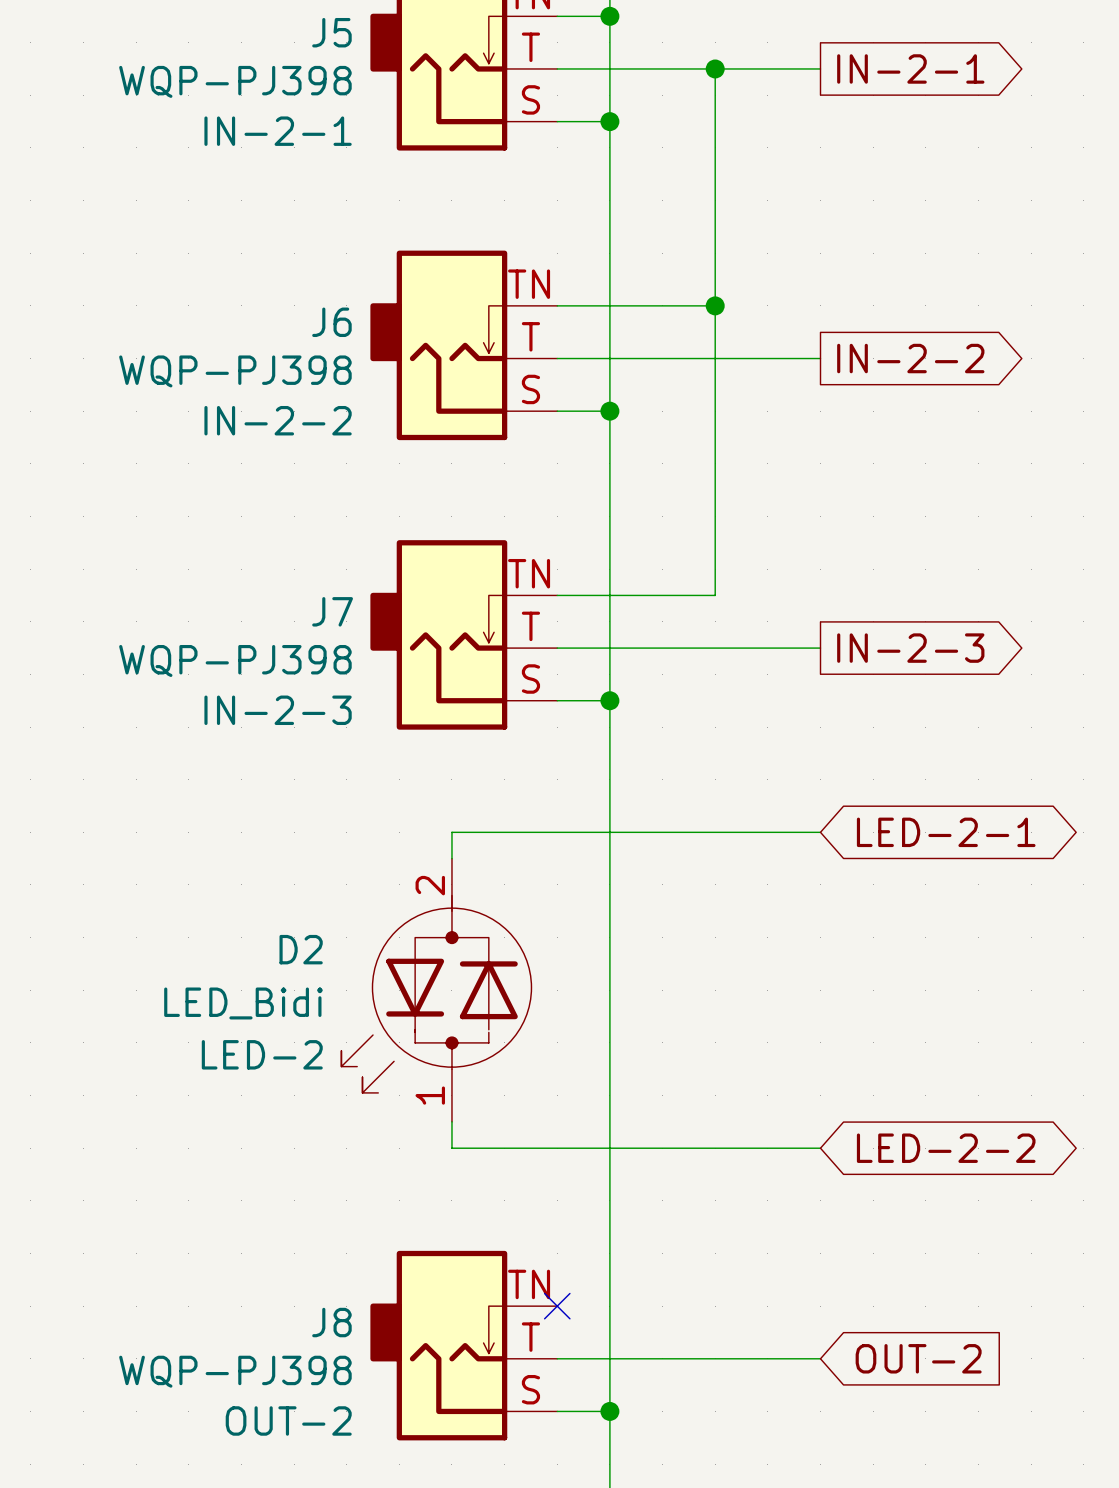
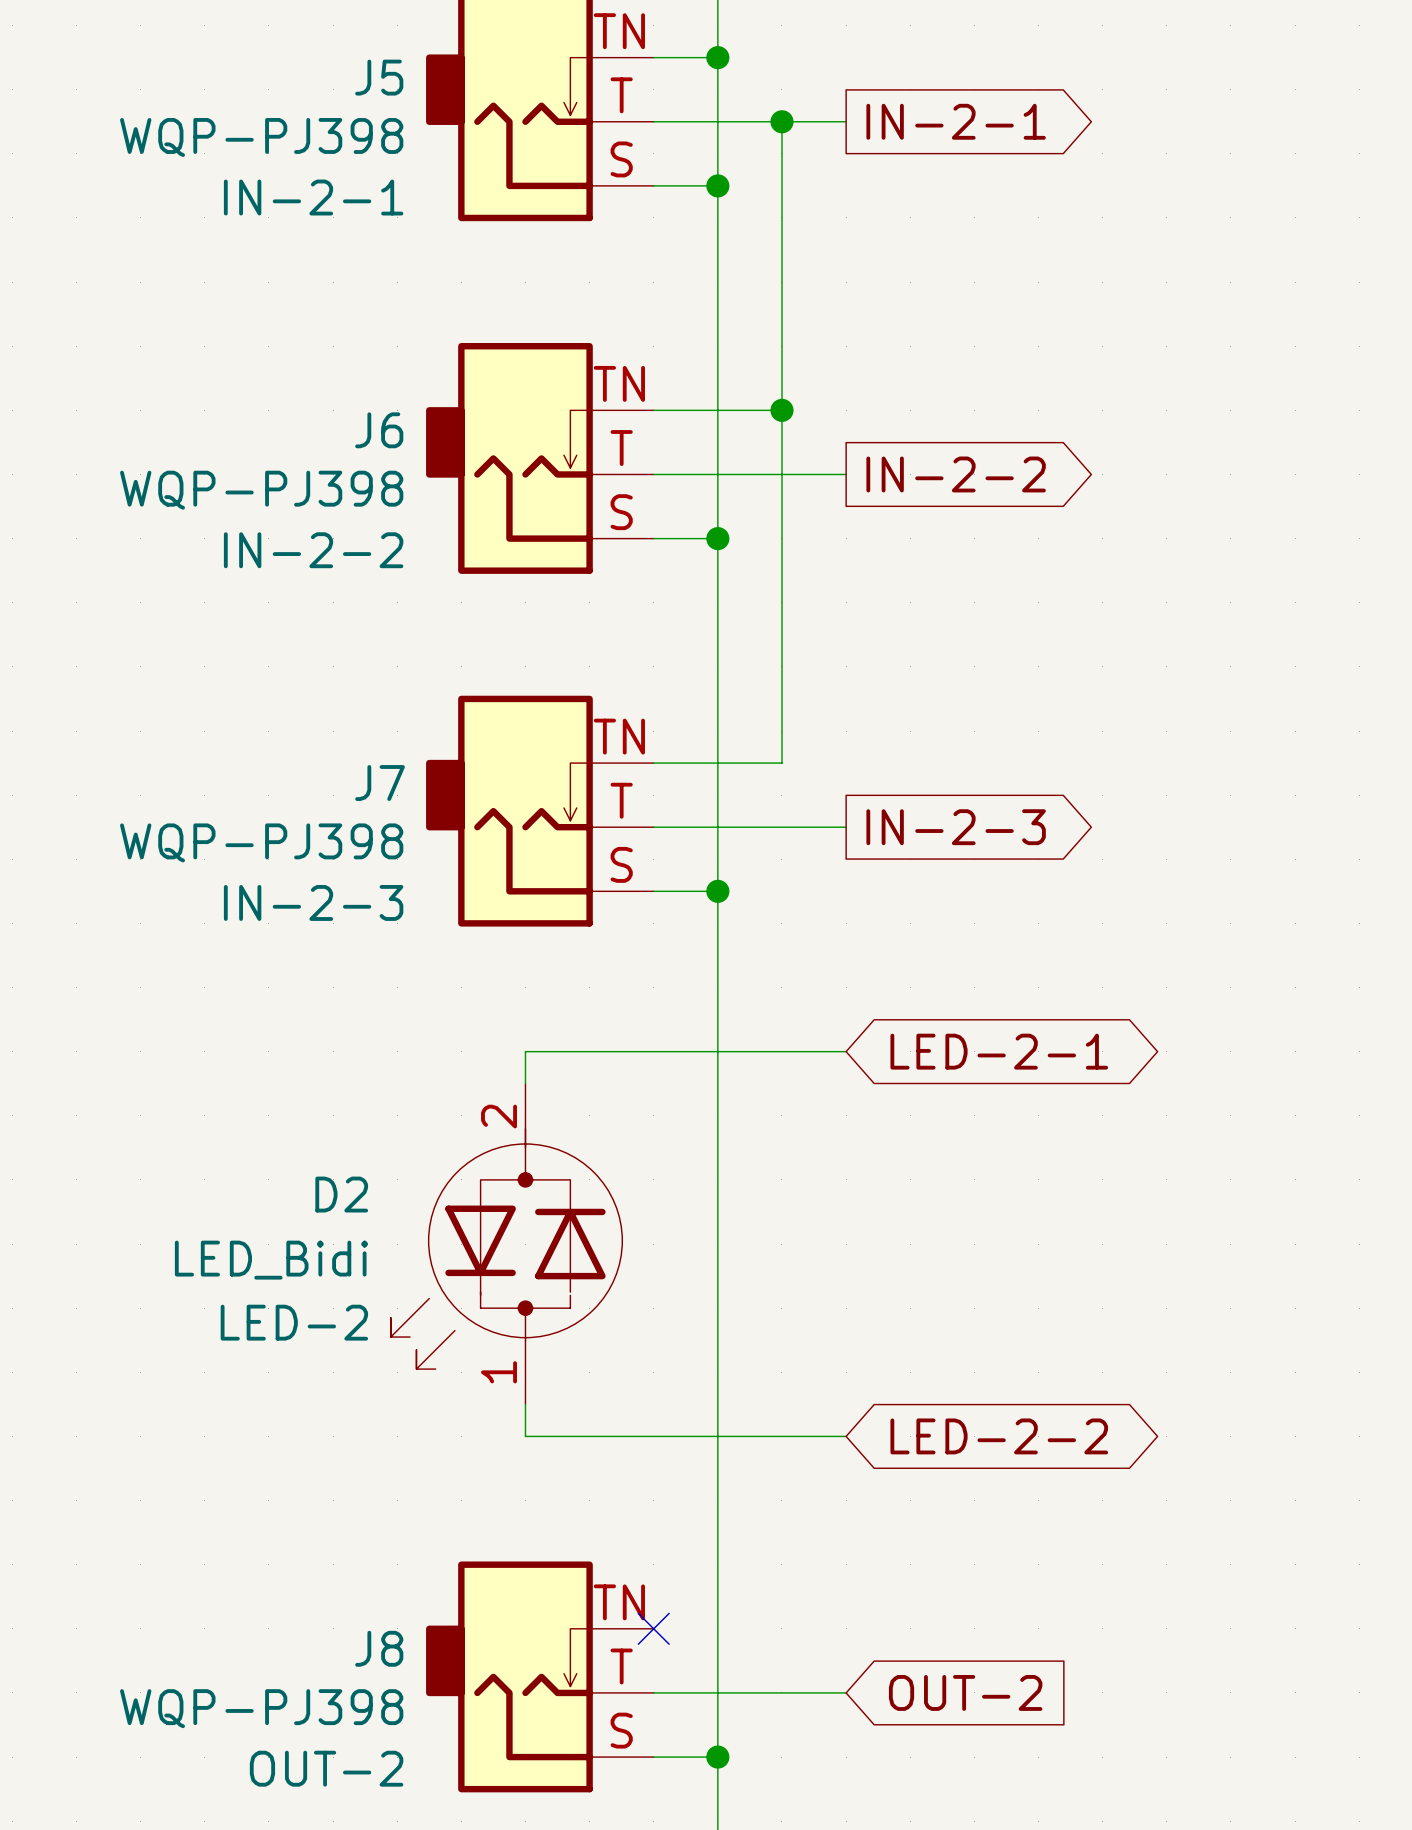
junction position: (715, 68) -> (781, 121)
wire: (820, 68) (715, 68) (715, 595) (662, 595) -> (781, 121) (781, 763)
global label position: IN-2-1 (910, 68) -> IN-2-1 (956, 121)
wire: (662, 305) (715, 305) -> none
junction position: (715, 305) -> (781, 410)
wire: (715, 358) (820, 358) -> none
global label position: IN-2-2 (910, 358) -> IN-2-2 (956, 474)
wire: (715, 648) (820, 648) -> none
global label position: IN-2-3 (910, 648) -> IN-2-3 (956, 827)
wire: (715, 832) (820, 832) -> none
global label position: LED-2-1 (946, 832) -> LED-2-1 (999, 1051)
wire: (715, 1148) (820, 1148) -> none
global label position: LED-2-2 (946, 1148) -> LED-2-2 (999, 1436)
wire: (715, 1358) (820, 1358) -> none
global label position: OUT-2 (918, 1358) -> OUT-2 (965, 1692)

